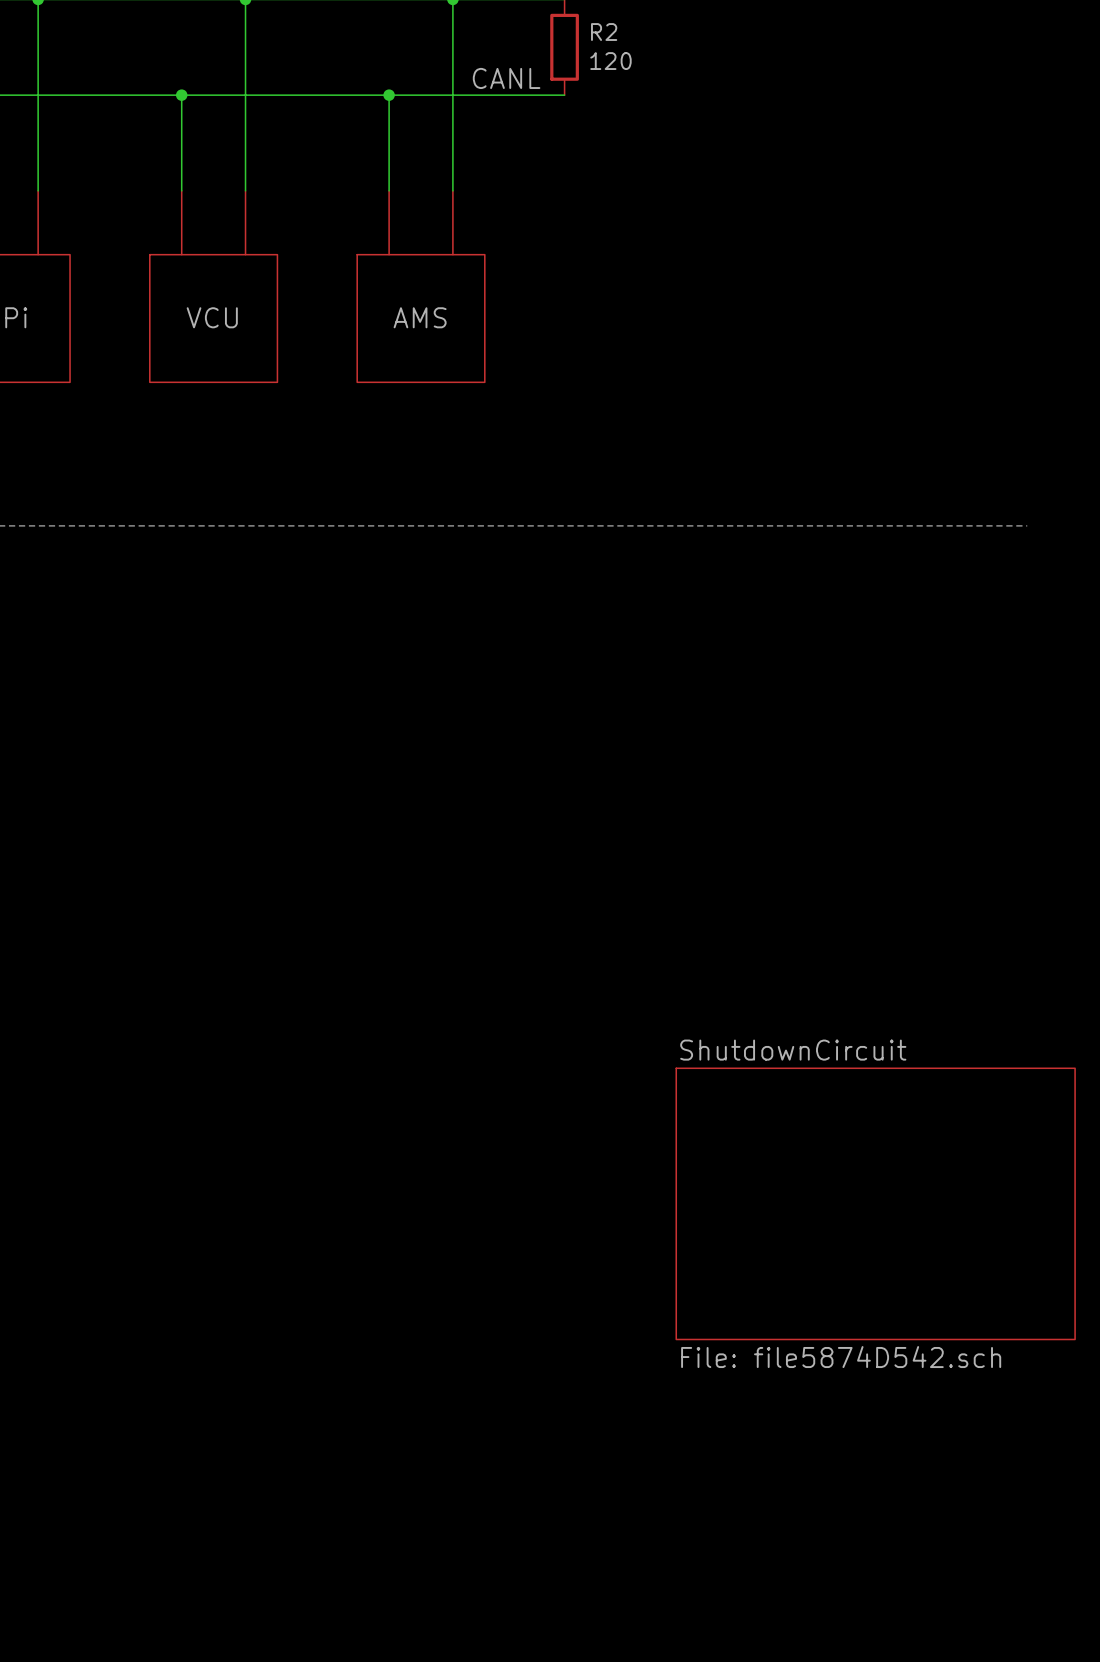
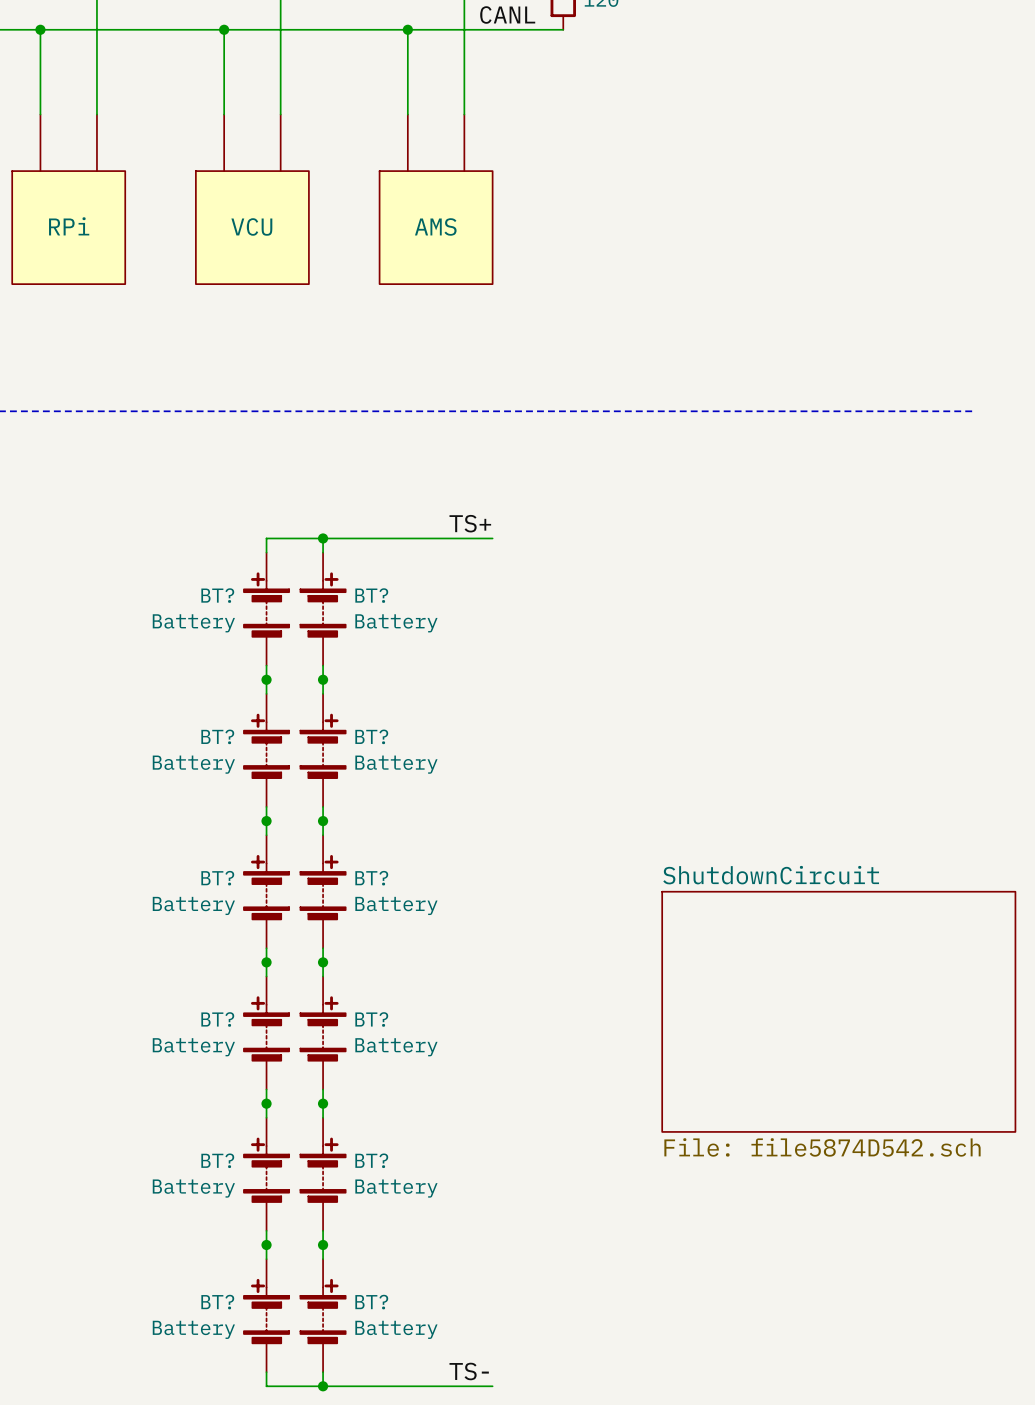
label: none -> TS+ (470, 523)
wire: none -> (323, 538) (323, 552)
junction: none -> (323, 538)
wire: none -> (492, 538) (266, 538) (266, 552)
BT?: none -> Battery (266, 609)
BT?: none -> Battery (323, 609)
wire: none -> (266, 665) (266, 693)
wire: none -> (323, 665) (323, 693)
junction: none -> (266, 679)
junction: none -> (323, 679)
BT?: none -> Battery (266, 750)
BT?: none -> Battery (323, 750)
wire: none -> (266, 806) (266, 835)
wire: none -> (323, 806) (323, 835)
junction: none -> (266, 821)
junction: none -> (323, 821)
BT?: none -> Battery (266, 891)
BT?: none -> Battery (323, 891)
wire: none -> (266, 948) (266, 976)
wire: none -> (323, 948) (323, 976)
junction: none -> (266, 962)
junction: none -> (323, 962)
BT?: none -> Battery (266, 1033)
BT?: none -> Battery (323, 1033)
wire: none -> (266, 1089) (266, 1117)
wire: none -> (323, 1089) (323, 1117)
junction: none -> (266, 1103)
junction: none -> (323, 1103)
BT?: none -> Battery (266, 1174)
BT?: none -> Battery (323, 1174)
wire: none -> (266, 1230) (266, 1259)
wire: none -> (323, 1230) (323, 1259)
junction: none -> (266, 1244)
junction: none -> (323, 1244)
BT?: none -> Battery (266, 1315)
BT?: none -> Battery (323, 1315)
label: none -> TS- (469, 1371)
wire: none -> (266, 1372) (266, 1386) (492, 1386)
wire: none -> (323, 1372) (323, 1386)
junction: none -> (323, 1386)

